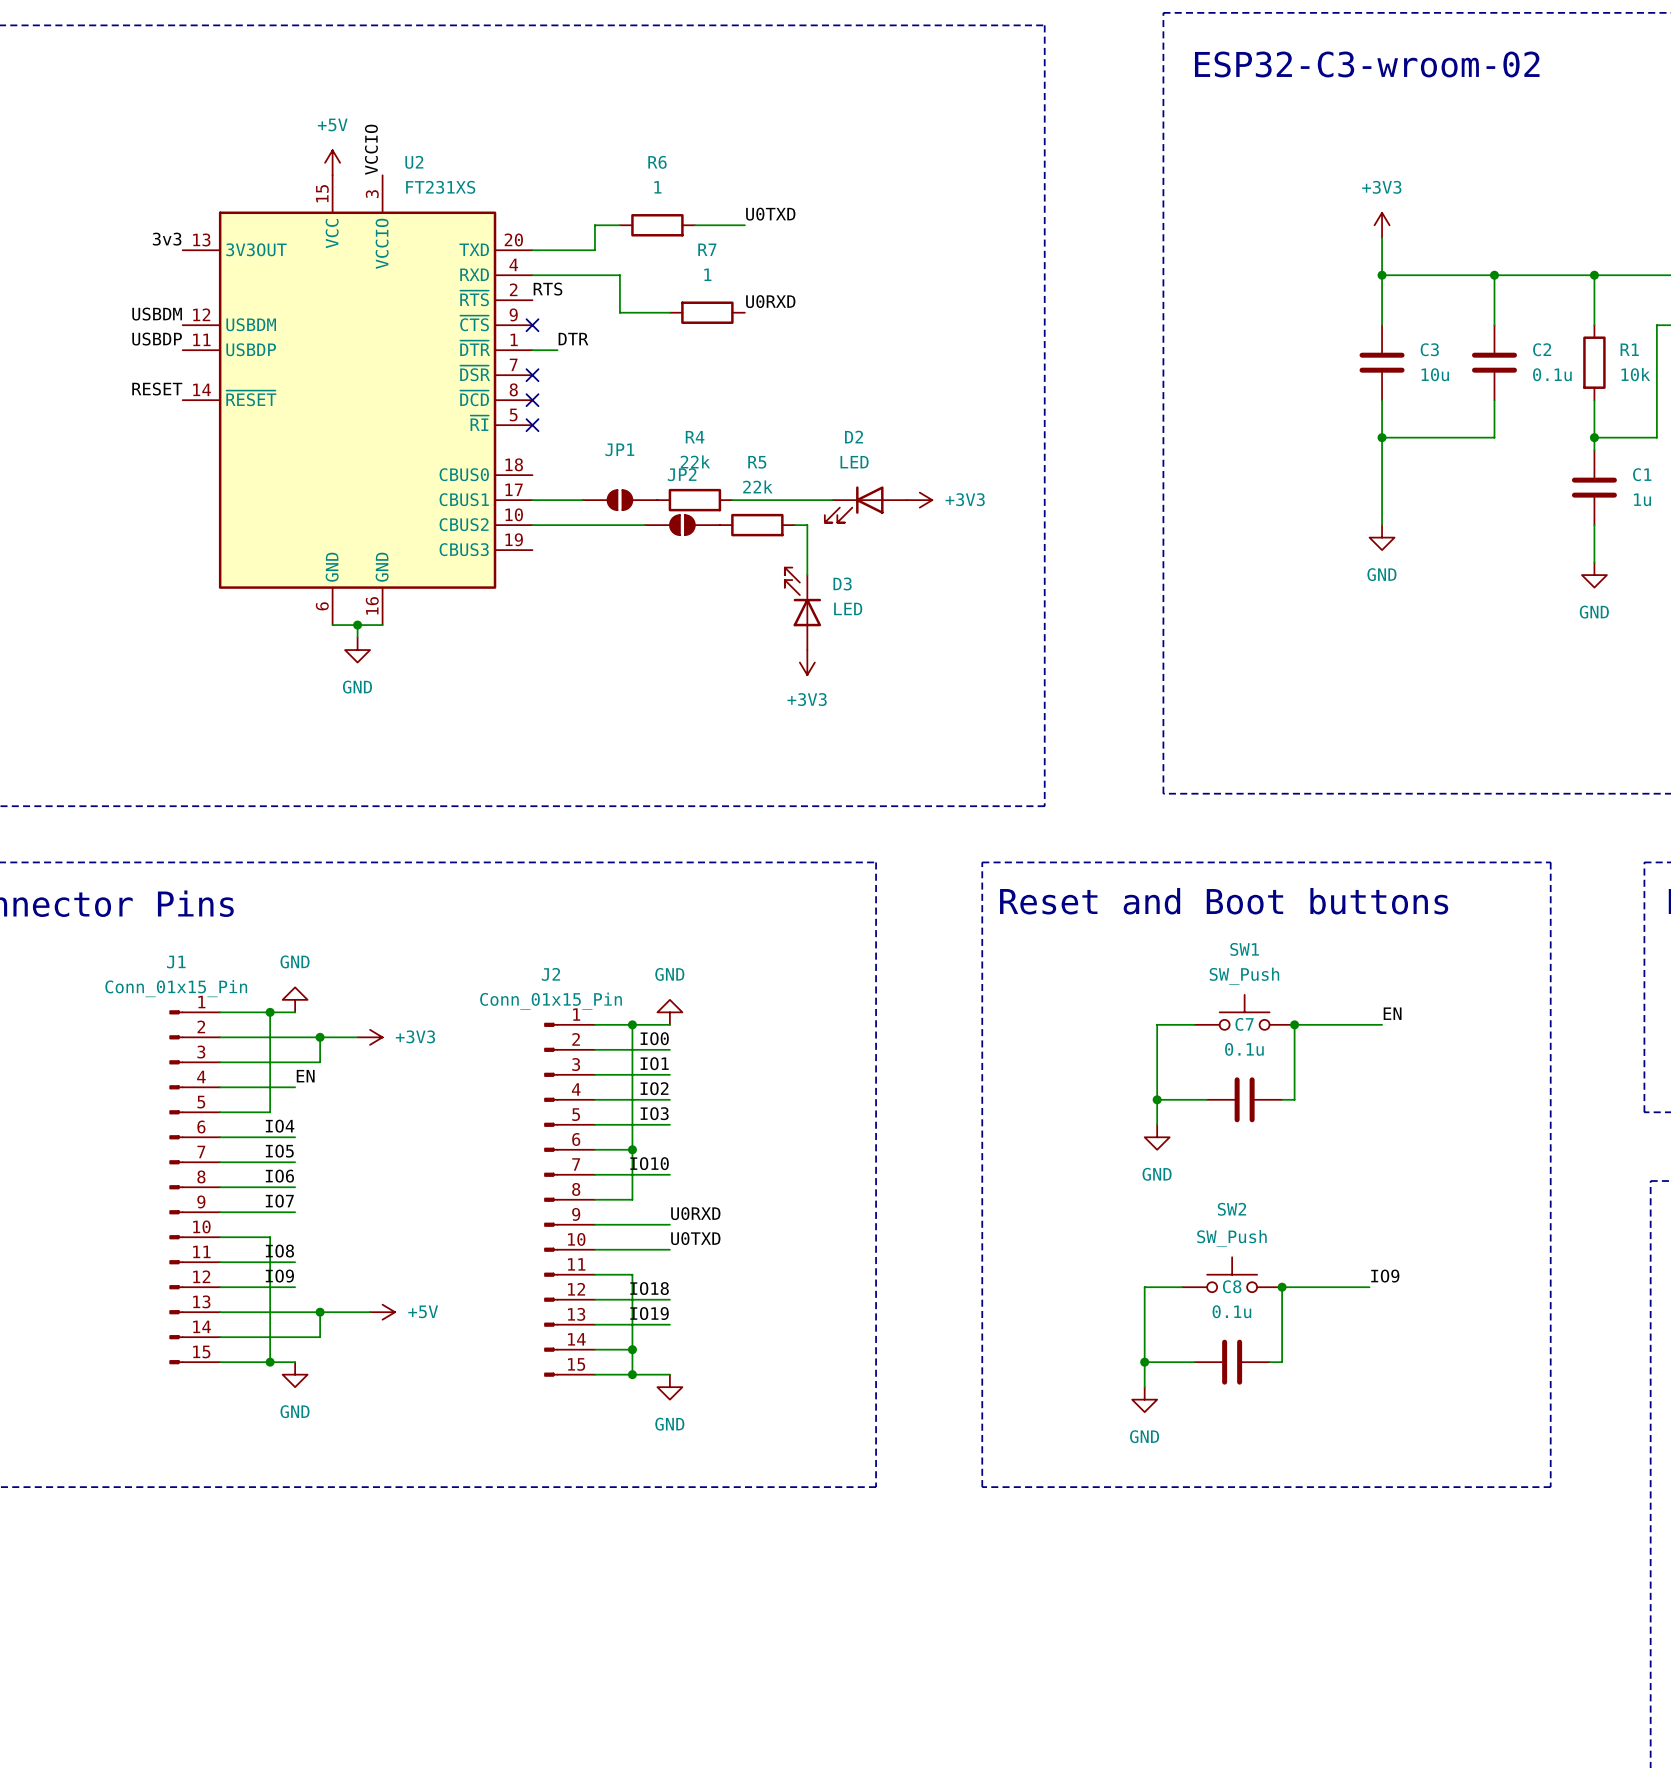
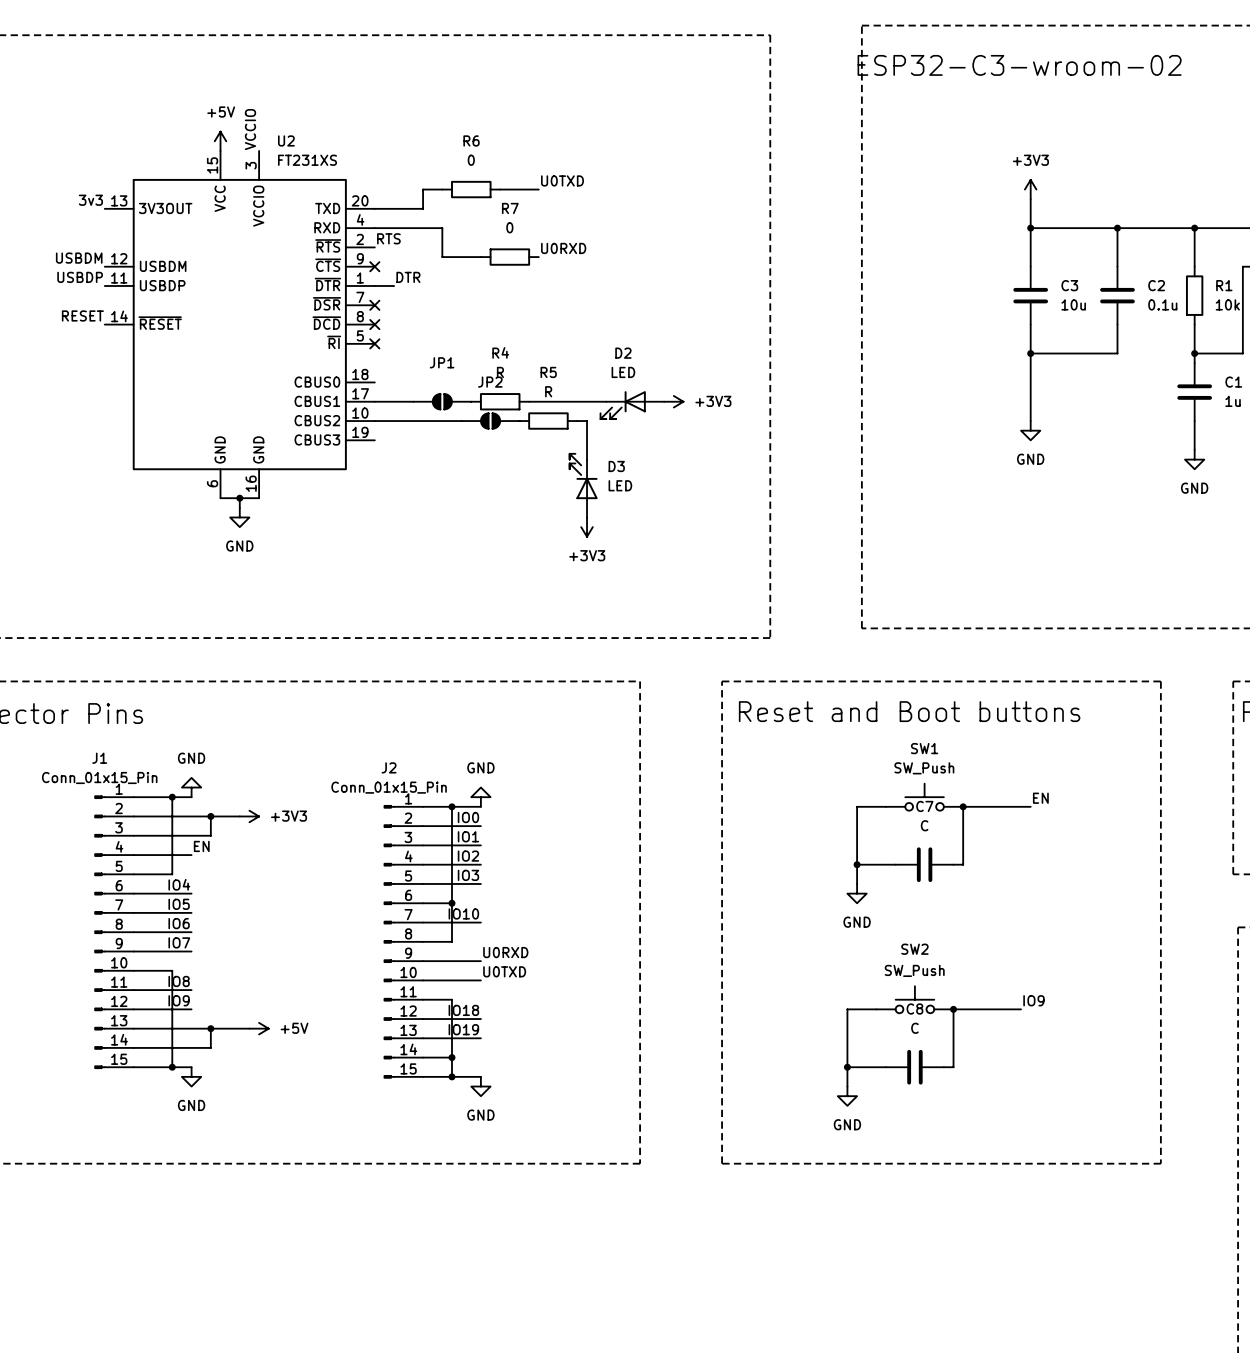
R6 value: 1 (657, 187) -> 0 (471, 160)
R7 value: 1 (707, 274) -> 0 (509, 227)
R4 value: 22k (695, 461) -> R (500, 372)
R5 value: 22k (757, 486) -> R (548, 391)
C7 value: 0.1u (1244, 1049) -> C (924, 825)
C8 value: 0.1u (1231, 1311) -> C (914, 1028)

